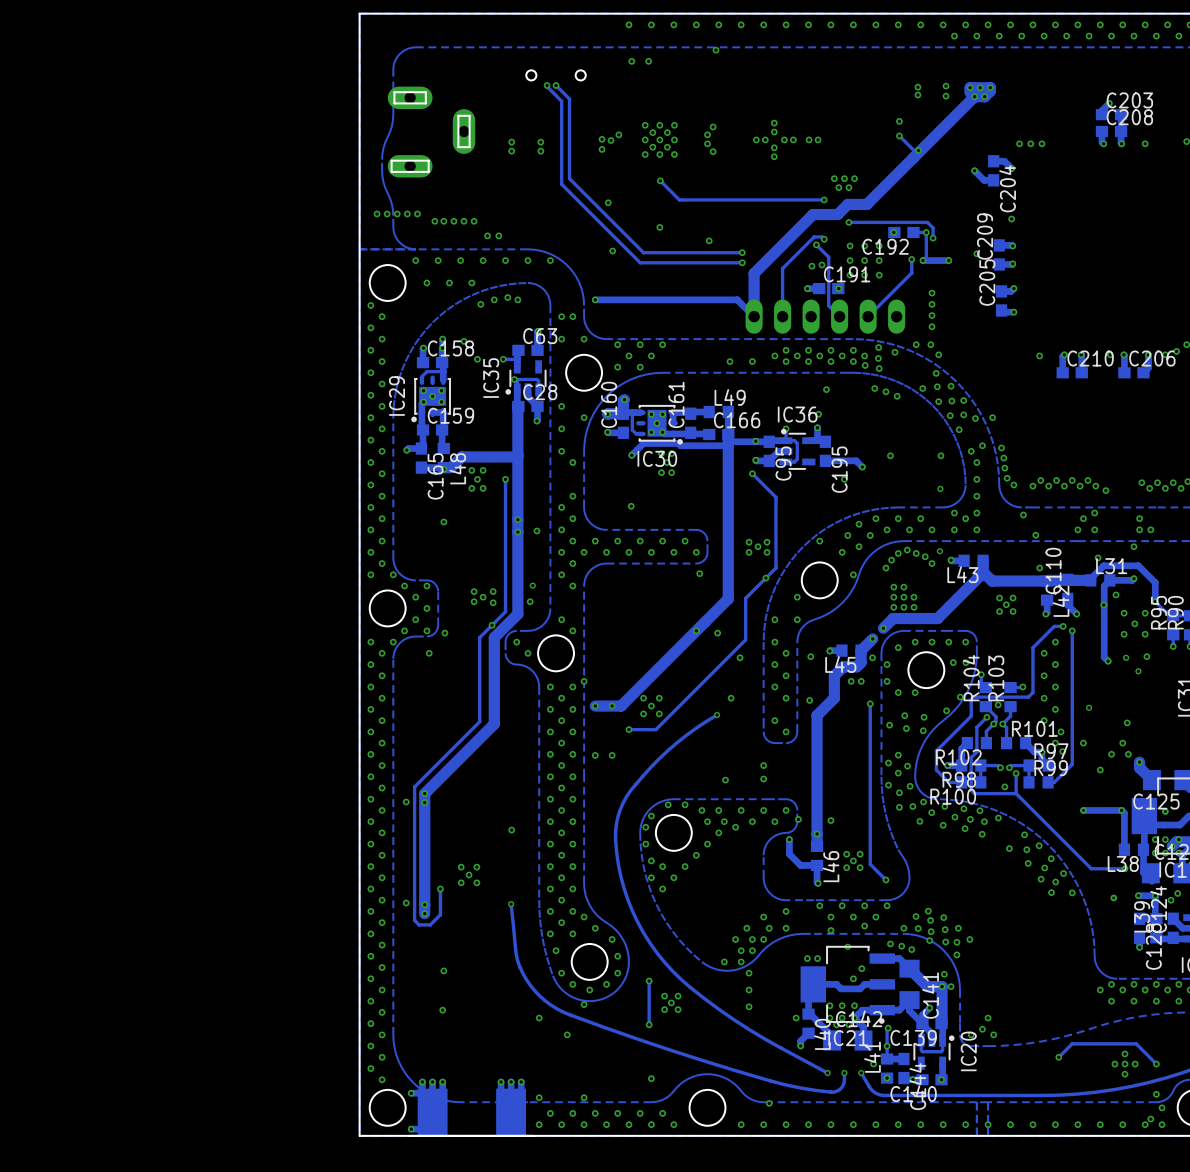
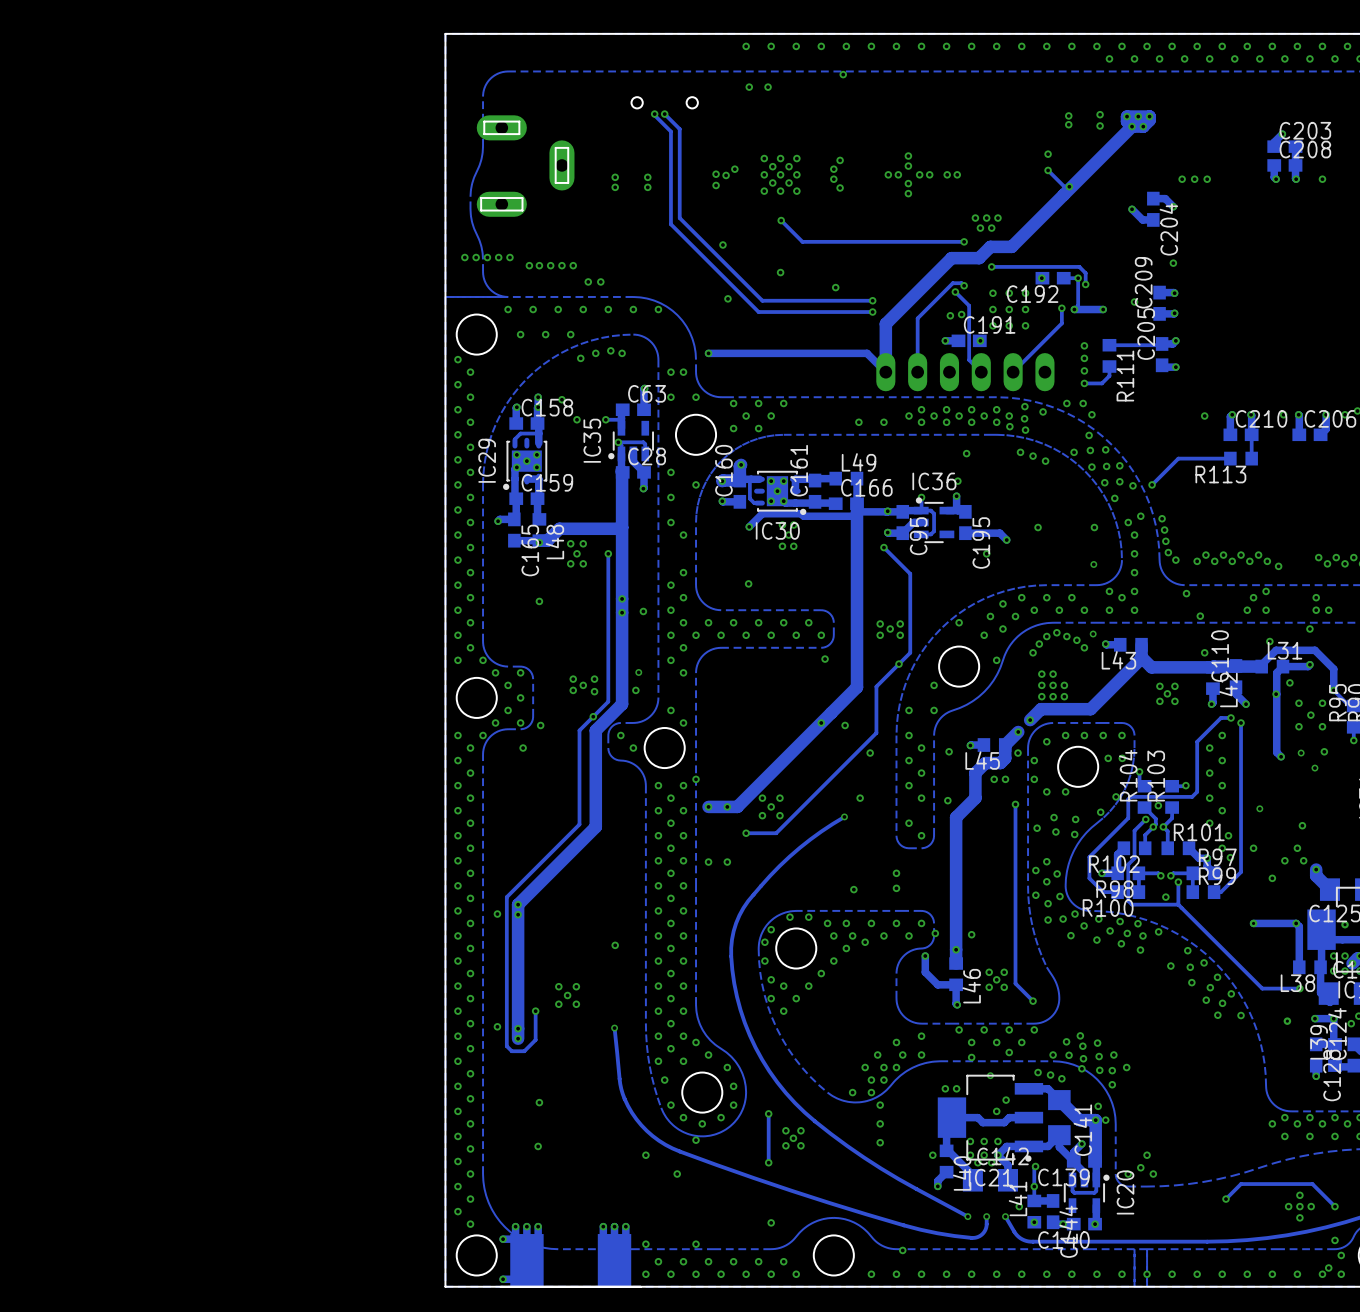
track: none -> (1162, 343) (1109, 345)
R111: none -> (1109, 355)
track: none -> (1109, 366) (1109, 375) (1101, 383) (1084, 383)
track: none -> (1251, 434) (1251, 458)
track: none -> (1230, 458) (1178, 458) (1152, 484)
R113: none -> (1241, 458)

